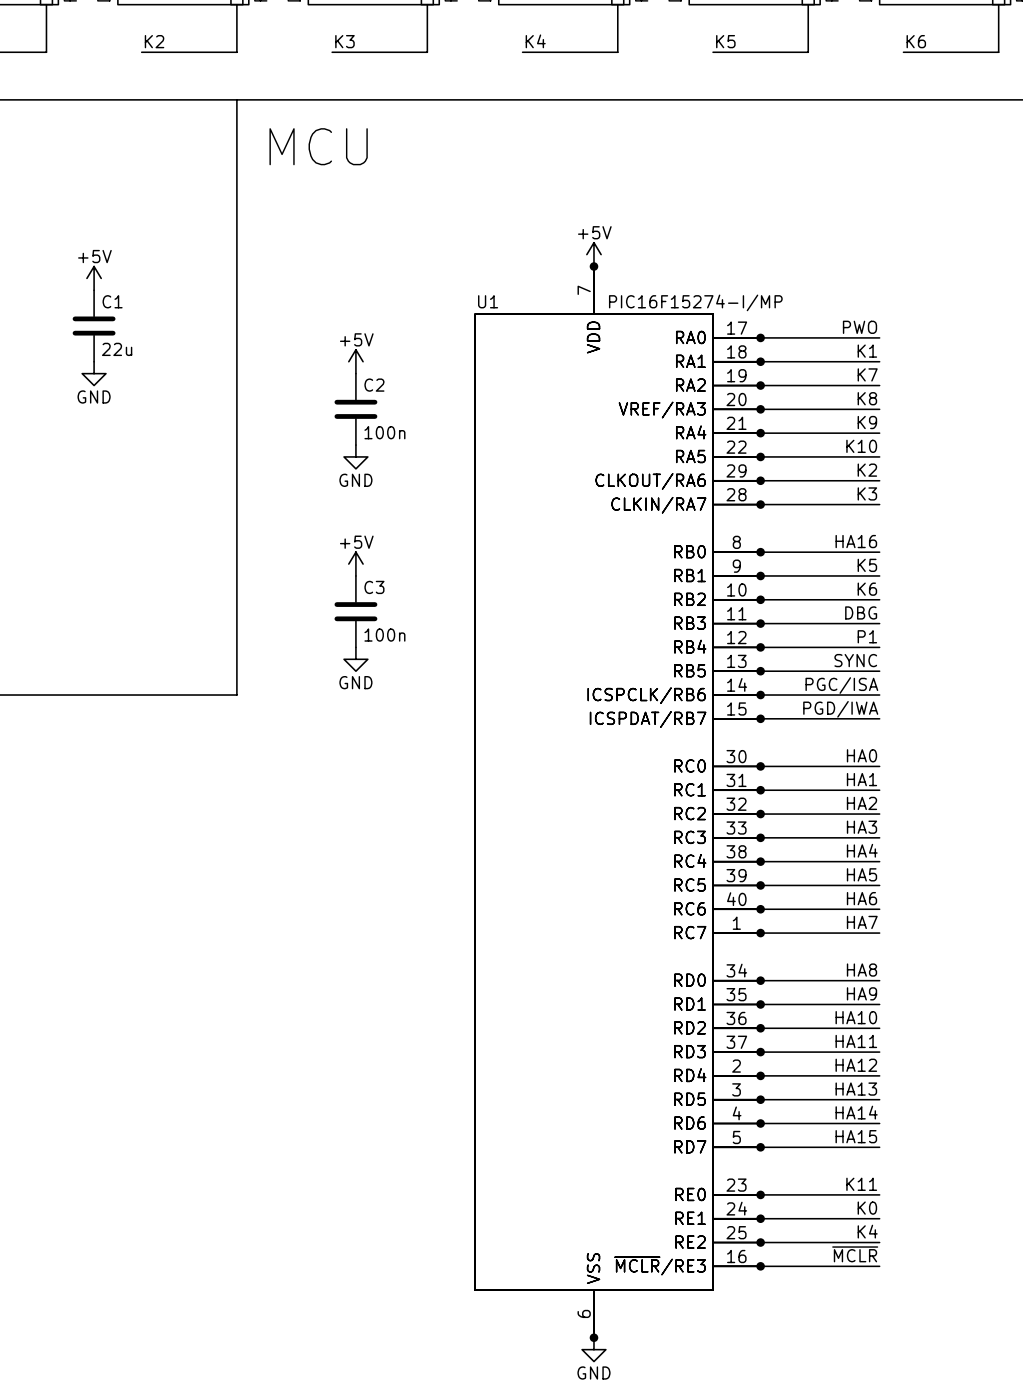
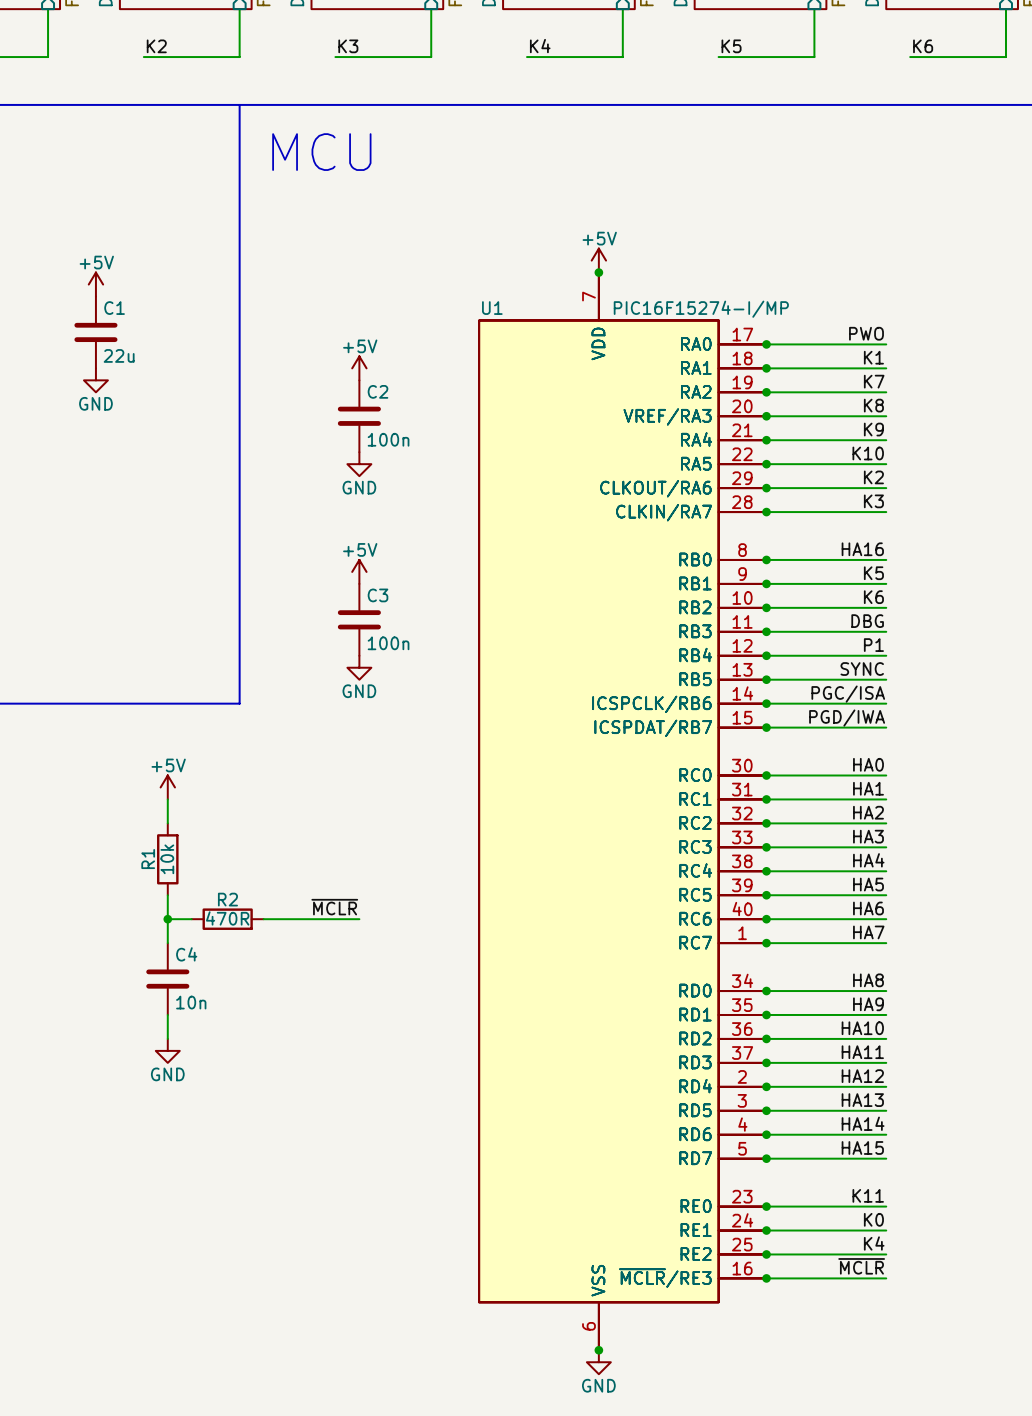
power symbol: none -> +5V (167, 787)
wire: none -> (167, 799) (167, 823)
R1: none -> 10k (167, 859)
wire: none -> (167, 895) (167, 943)
label: none -> ~{MCLR} (334, 907)
wire: none -> (167, 919) (191, 919)
junction: none -> (167, 919)
R2: none -> 470R (227, 919)
wire: none -> (263, 919) (359, 919)
C4: none -> 10n (167, 979)
wire: none -> (167, 1014) (167, 1038)
power symbol: none -> GND (167, 1050)

